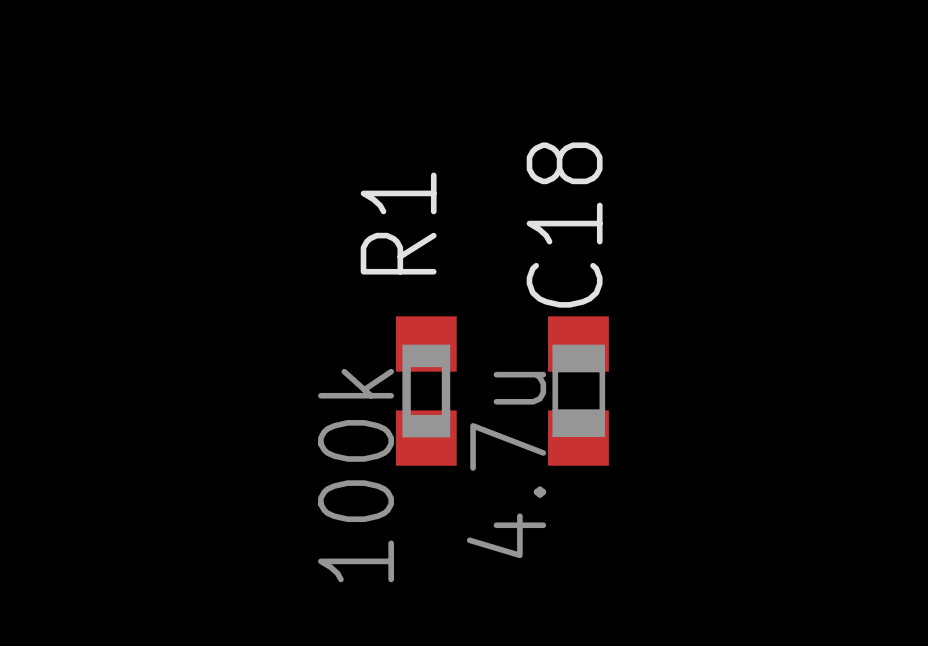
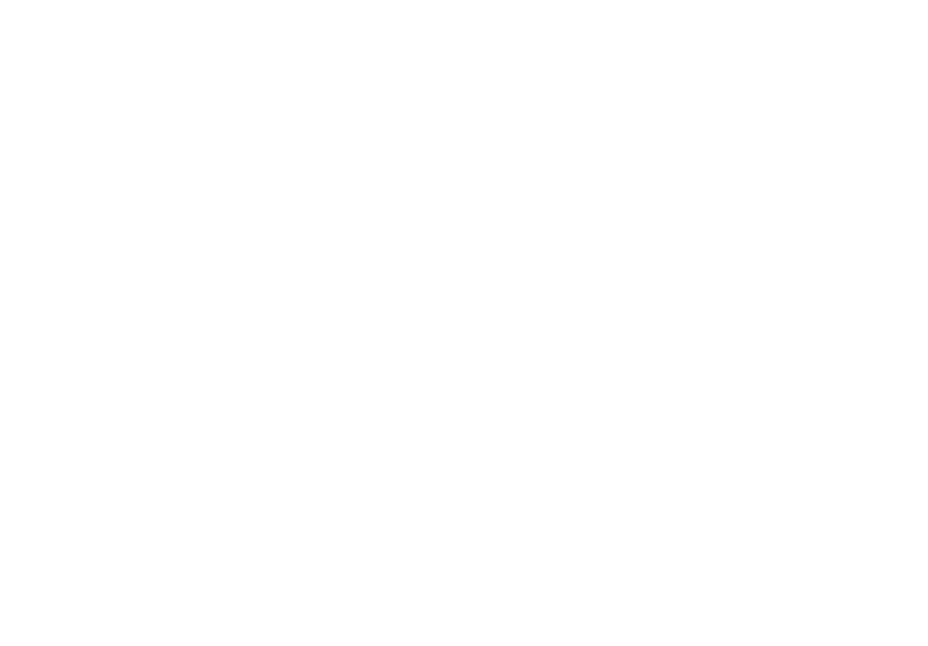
R1: 100k (426, 391) -> none
C18: 4.7u (578, 391) -> none

